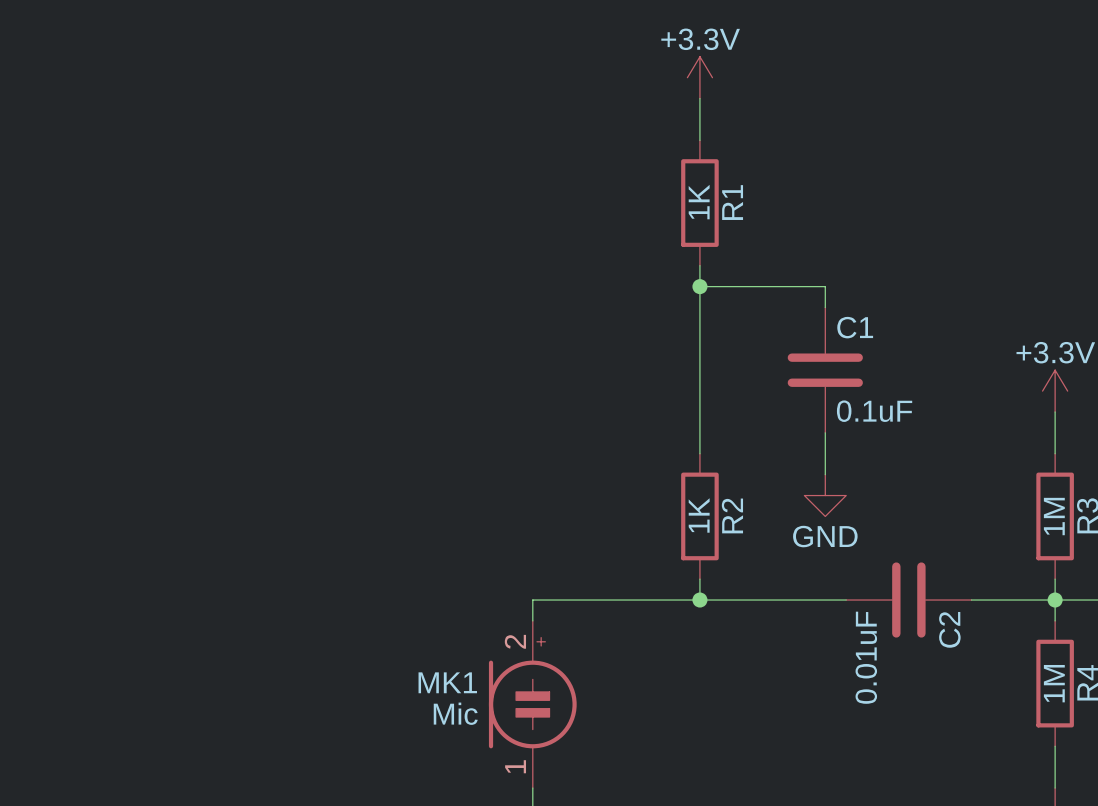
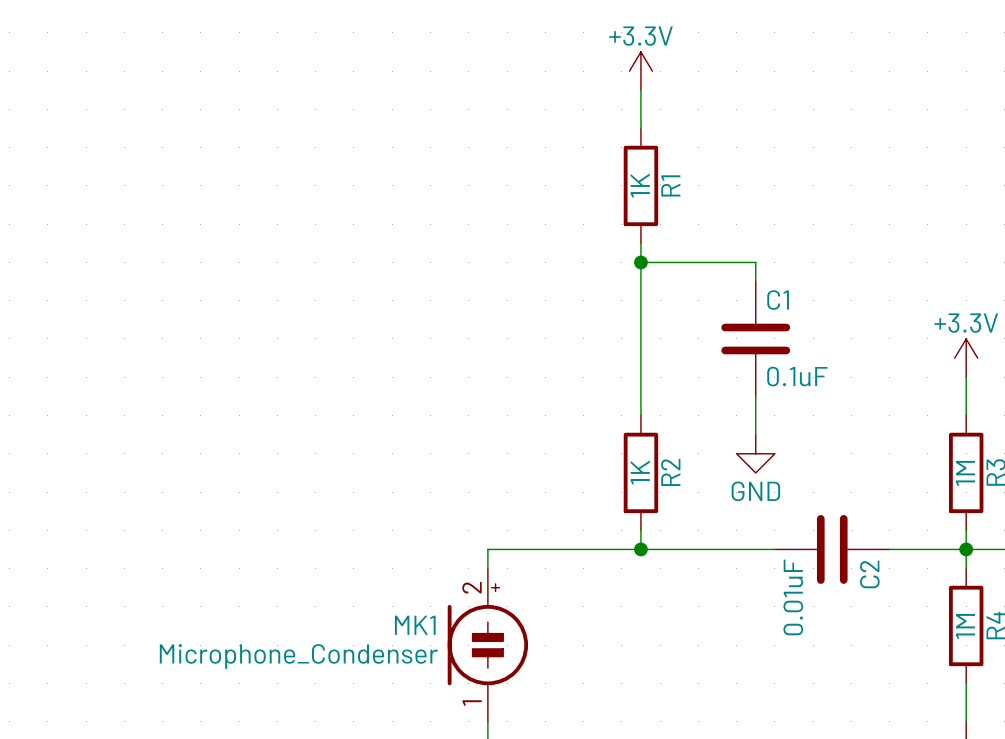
MK1 value: Mic (455, 713) -> Microphone_Condenser (298, 656)

